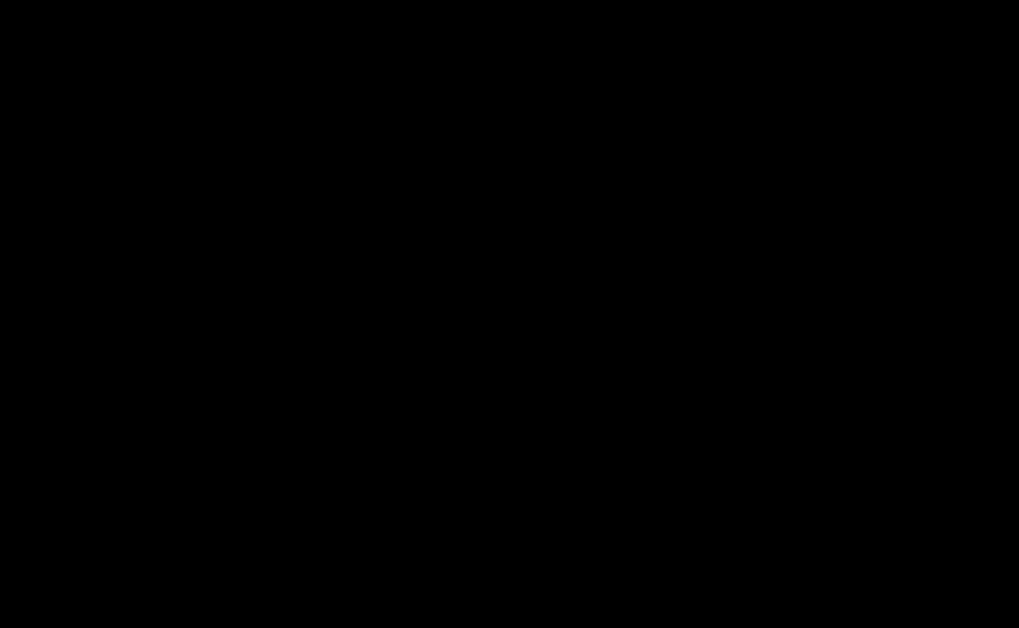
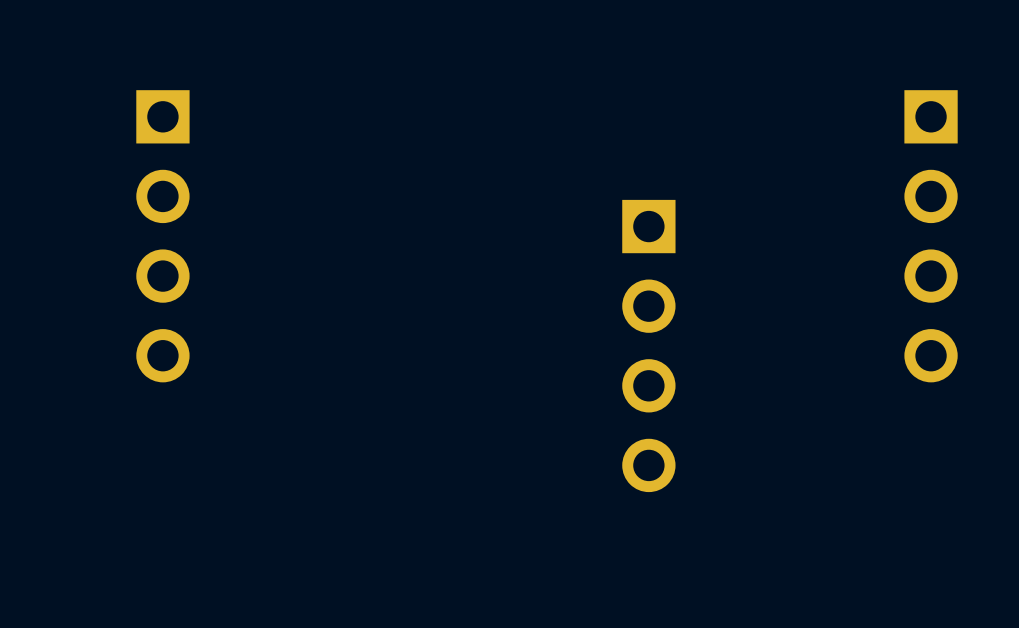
part: none -> (162, 236)
part: none -> (931, 236)
part: none -> (648, 345)

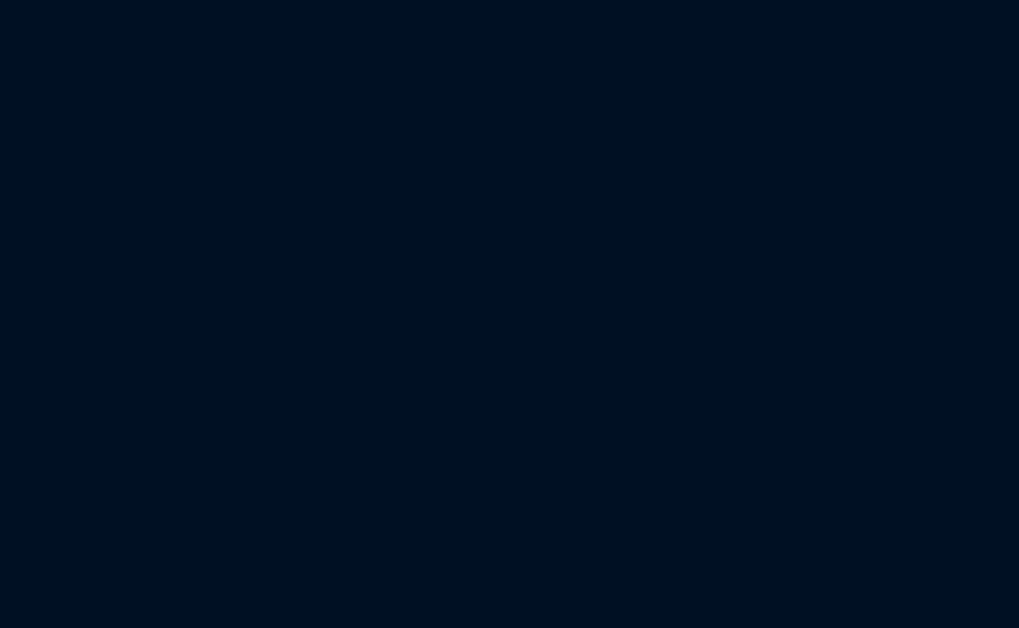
part: (162, 236) -> none
part: (931, 236) -> none
part: (648, 345) -> none

